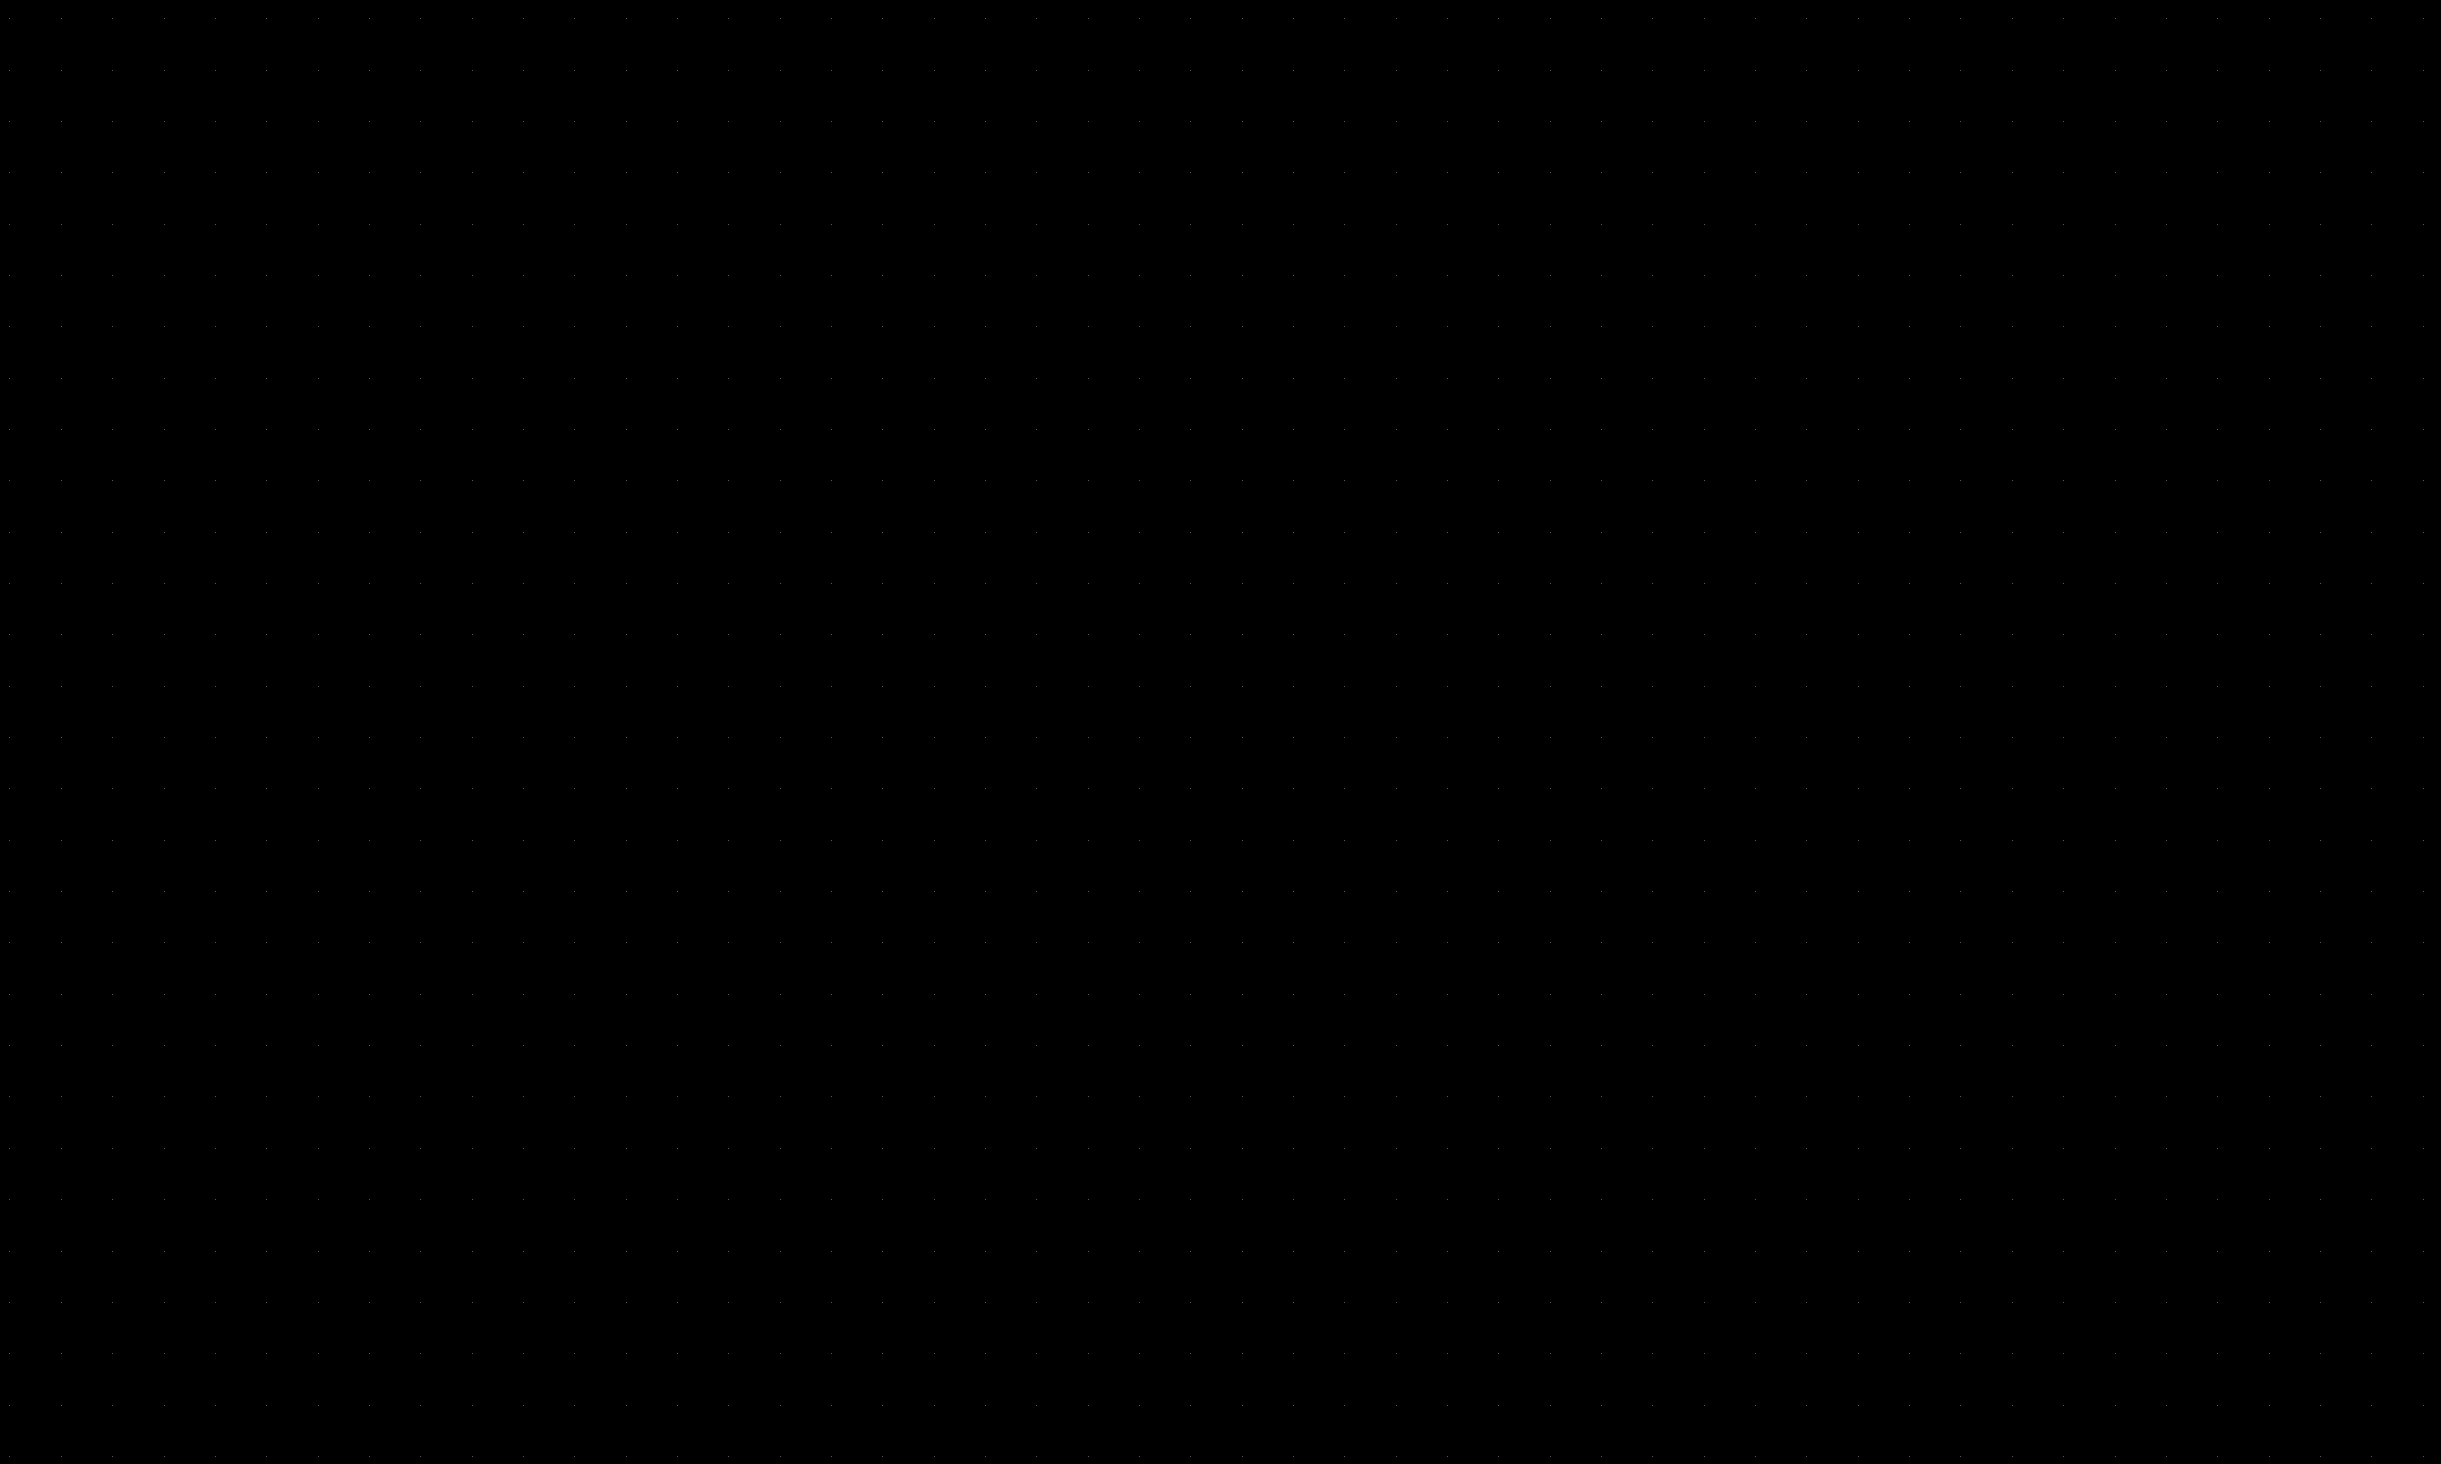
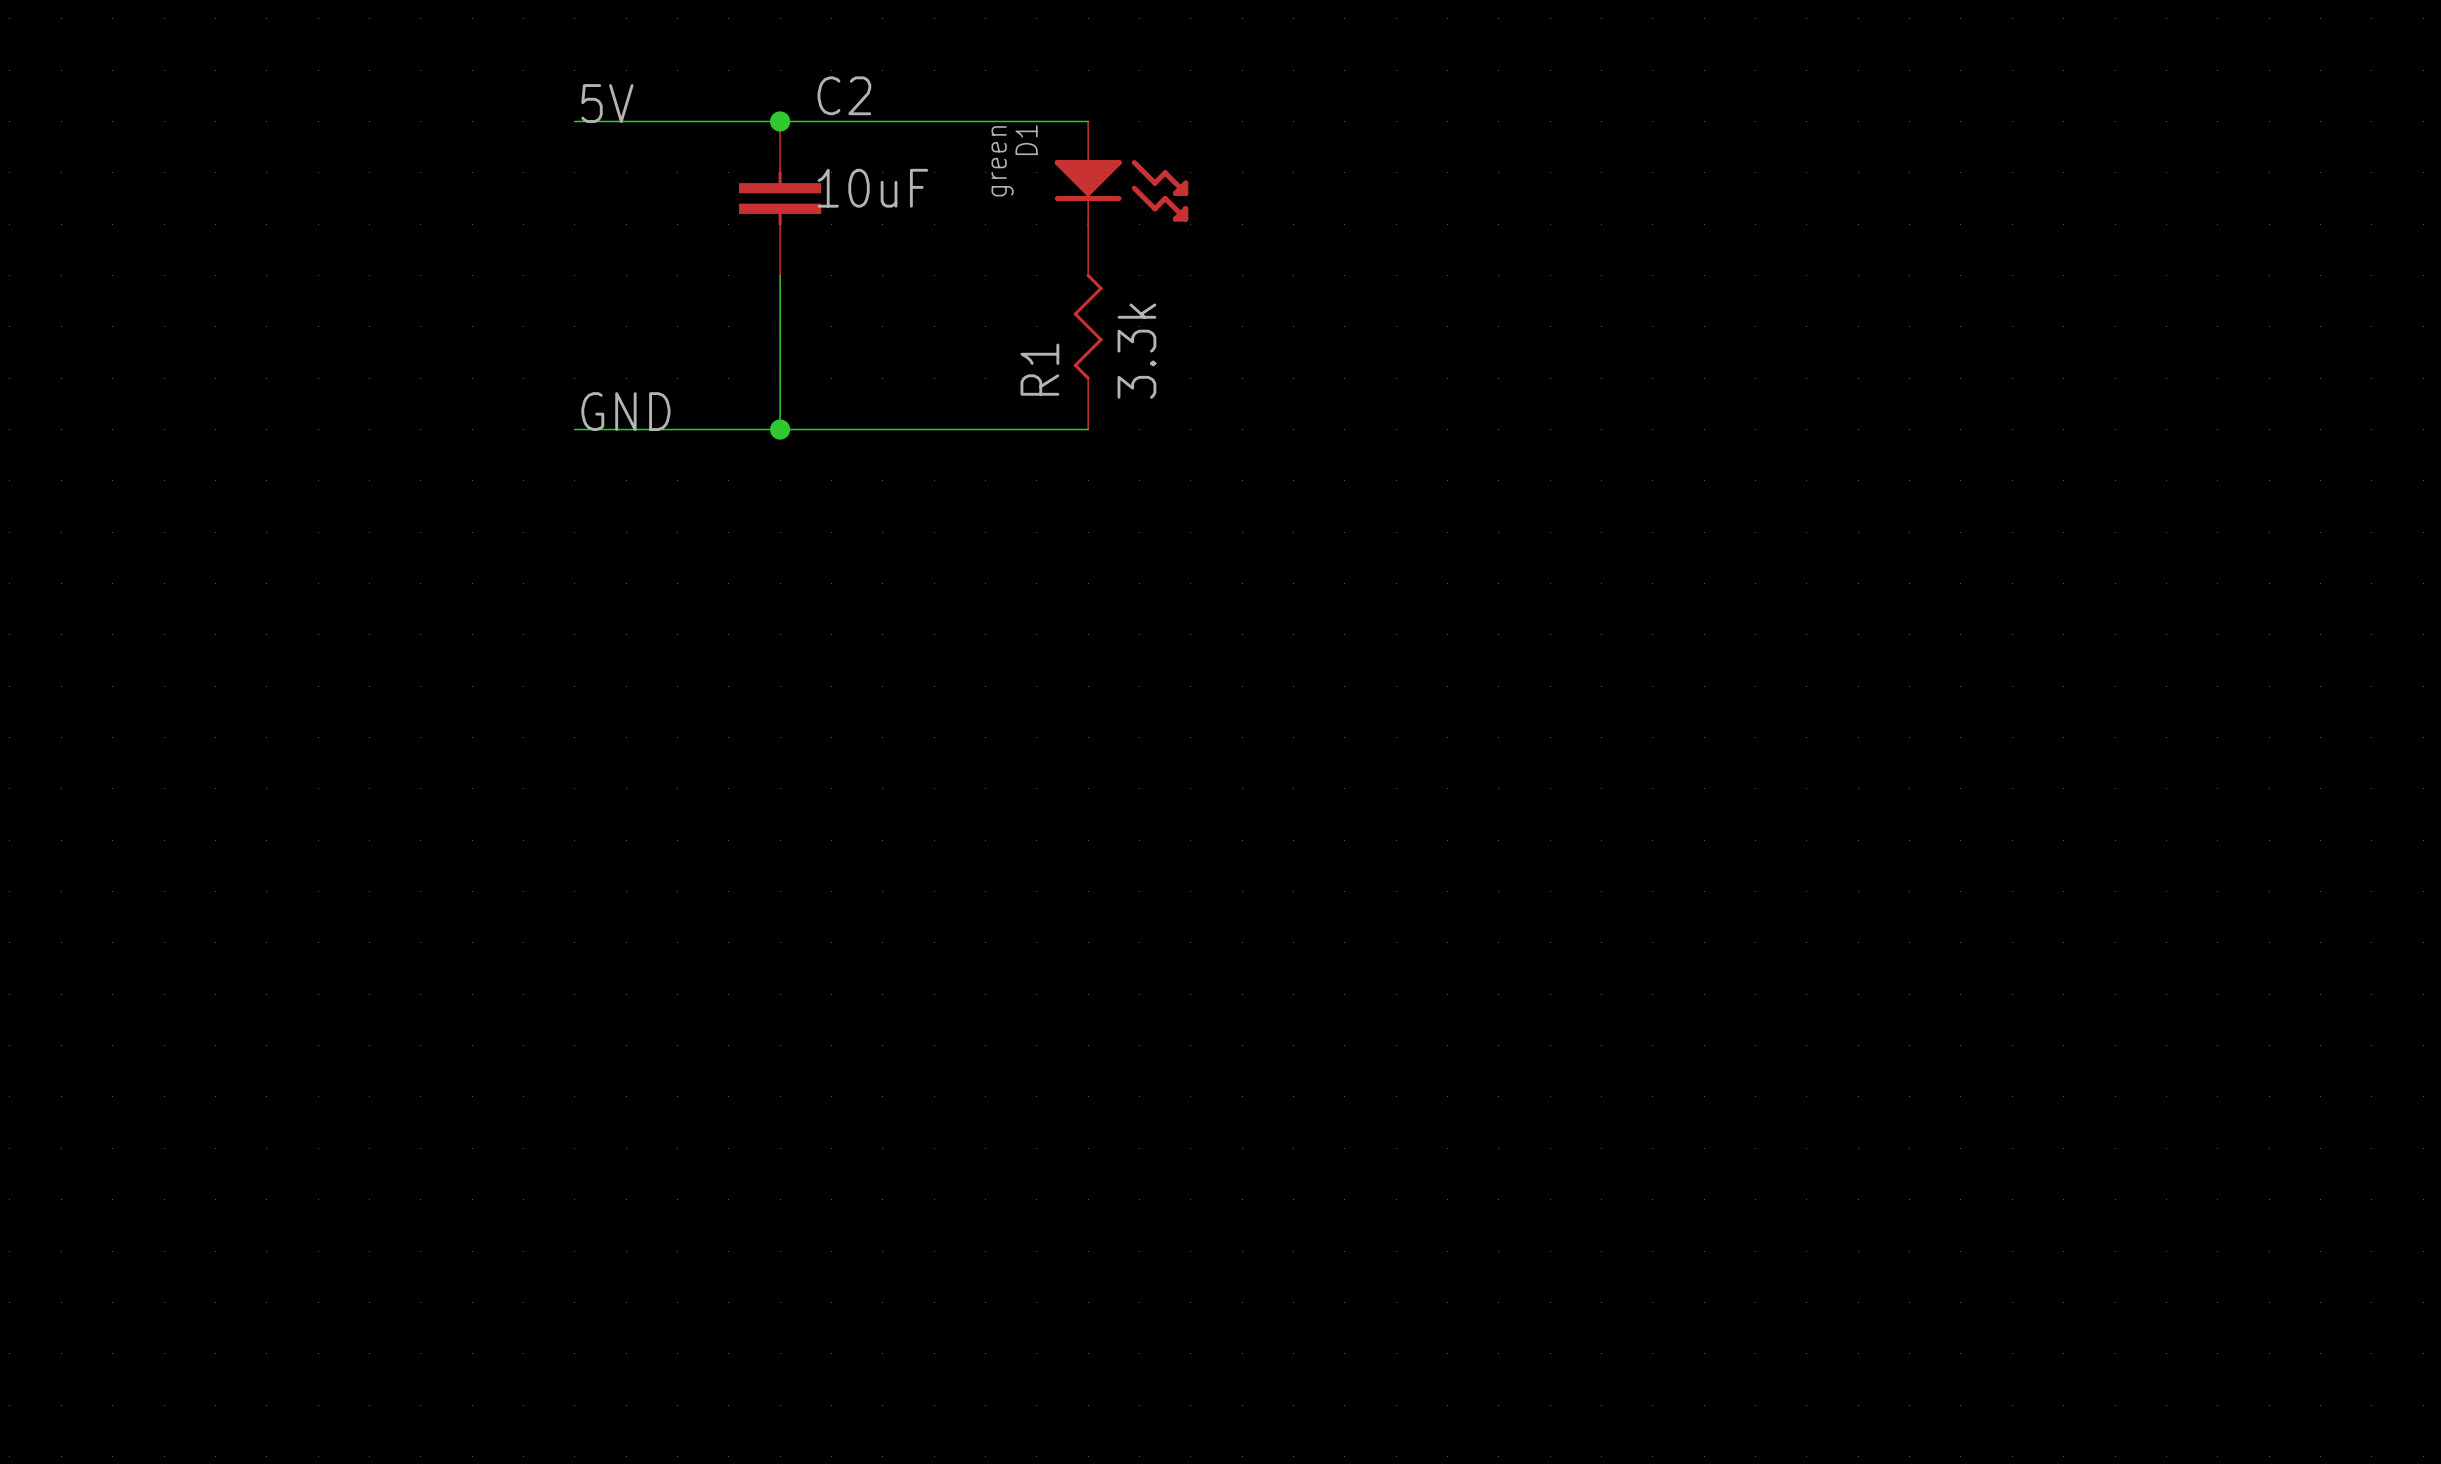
label: none -> 5V (607, 103)
wire: none -> (574, 121) (1088, 121)
junction: none -> (780, 121)
D1: none -> green (1121, 172)
C2: none -> 10uF (780, 198)
wire: none -> (780, 275) (780, 429)
R1: none -> 3.3k (1088, 326)
label: none -> GND (625, 411)
wire: none -> (574, 429) (1088, 429)
junction: none -> (780, 429)

